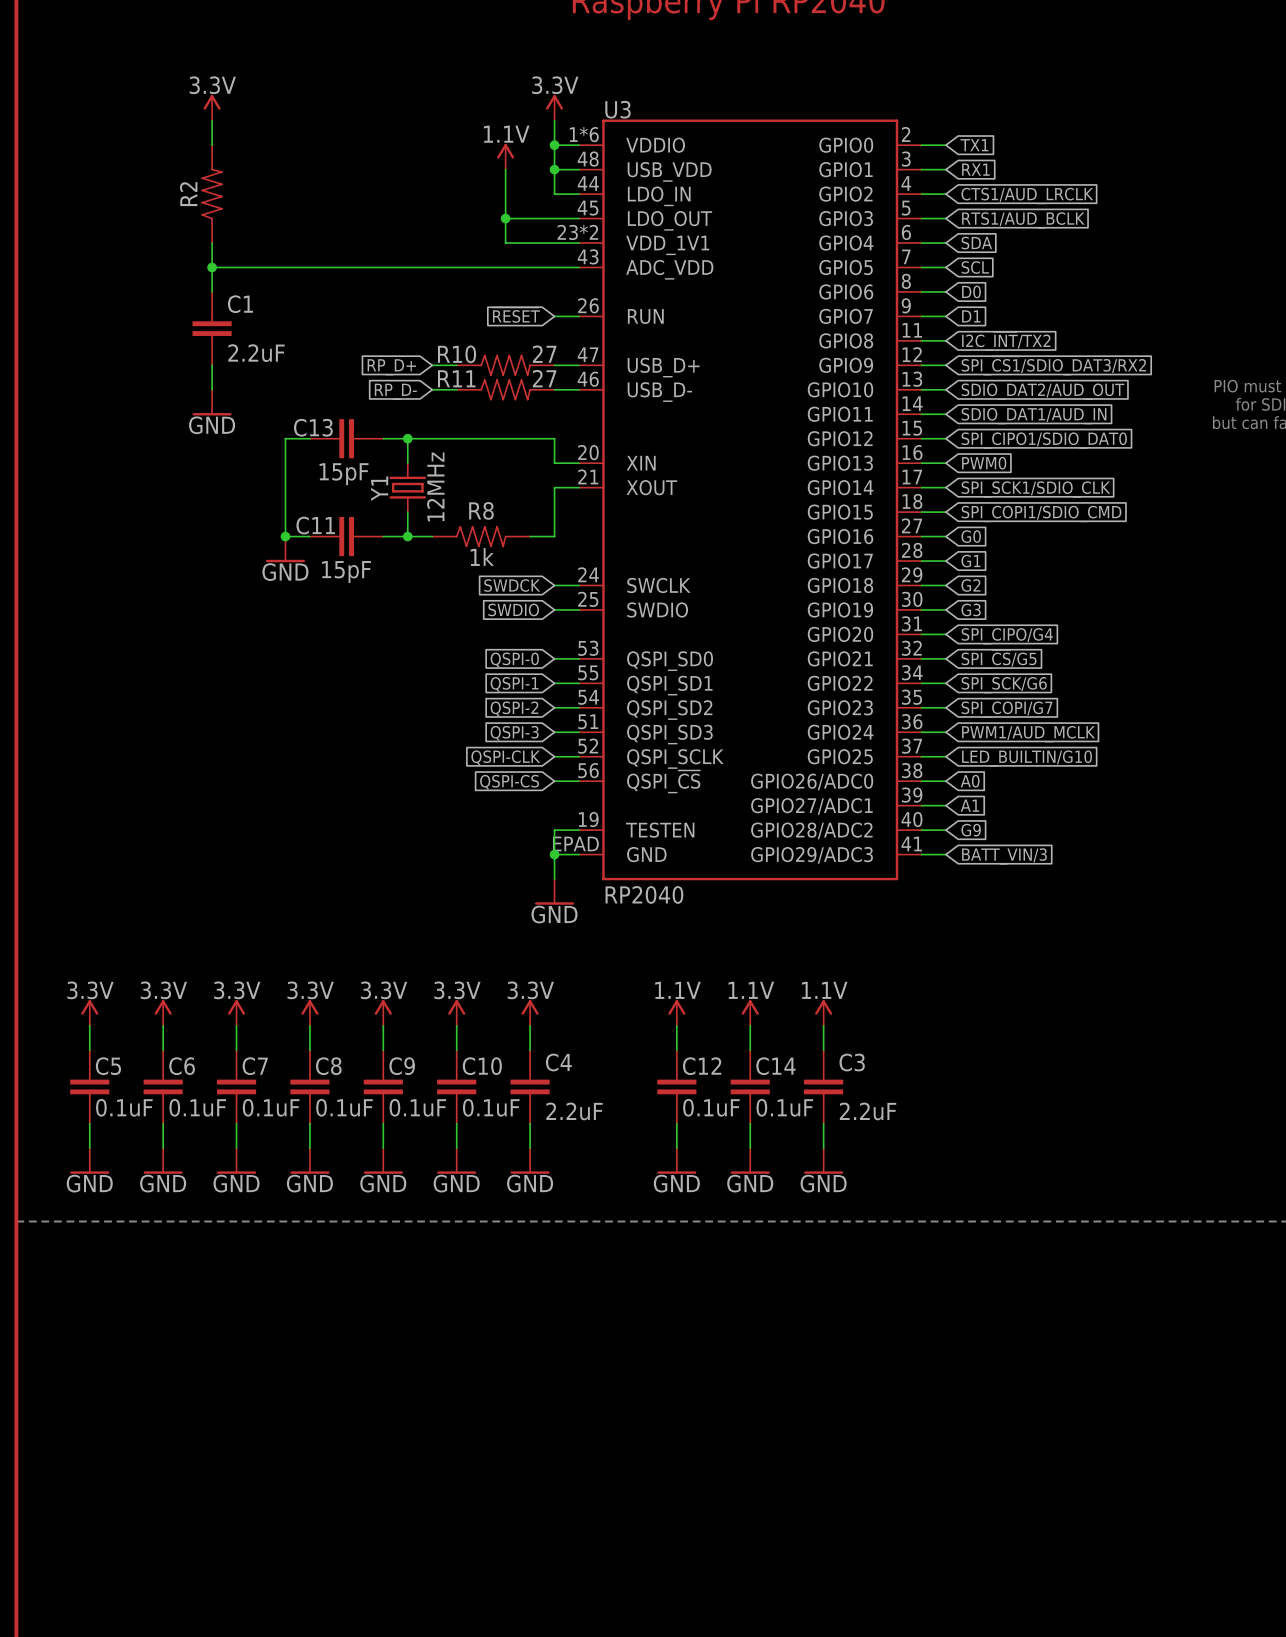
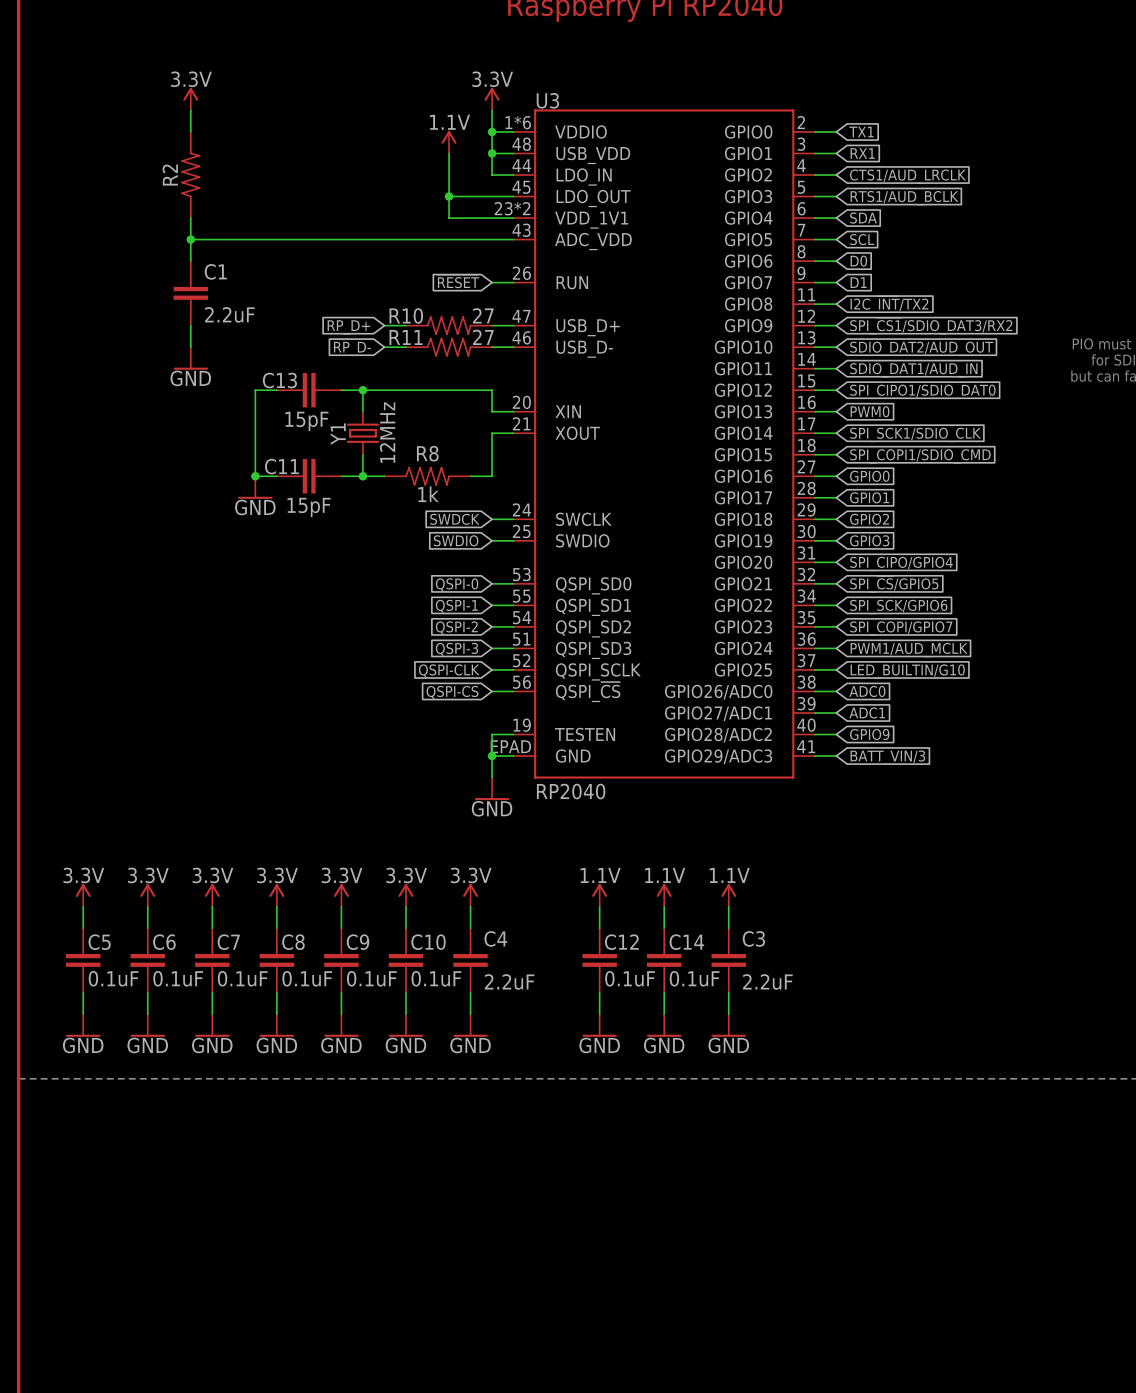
global label: G0 (971, 536) -> GPIO0 (869, 476)
global label: G1 (970, 561) -> GPIO1 (869, 497)
global label: G2 (970, 585) -> GPIO2 (869, 519)
global label: G3 (971, 609) -> GPIO3 (869, 540)
global label: SPI_CIPO/G4 (1007, 636) -> SPI_CIPO/GPIO4 (901, 564)
global label: SPI_~{CS}/G5 (999, 659) -> SPI_~{CS}/GPIO5 (894, 584)
global label: SPI_SCK/G6 (1004, 685) -> SPI_SCK/GPIO6 (898, 607)
global label: SPI_COPI/G7 (1007, 709) -> SPI_COPI/GPIO7 (901, 628)
global label: A0 (970, 781) -> ADC0 (867, 691)
global label: A1 (969, 805) -> ADC1 (867, 712)
global label: G9 (971, 830) -> GPIO9 (869, 734)

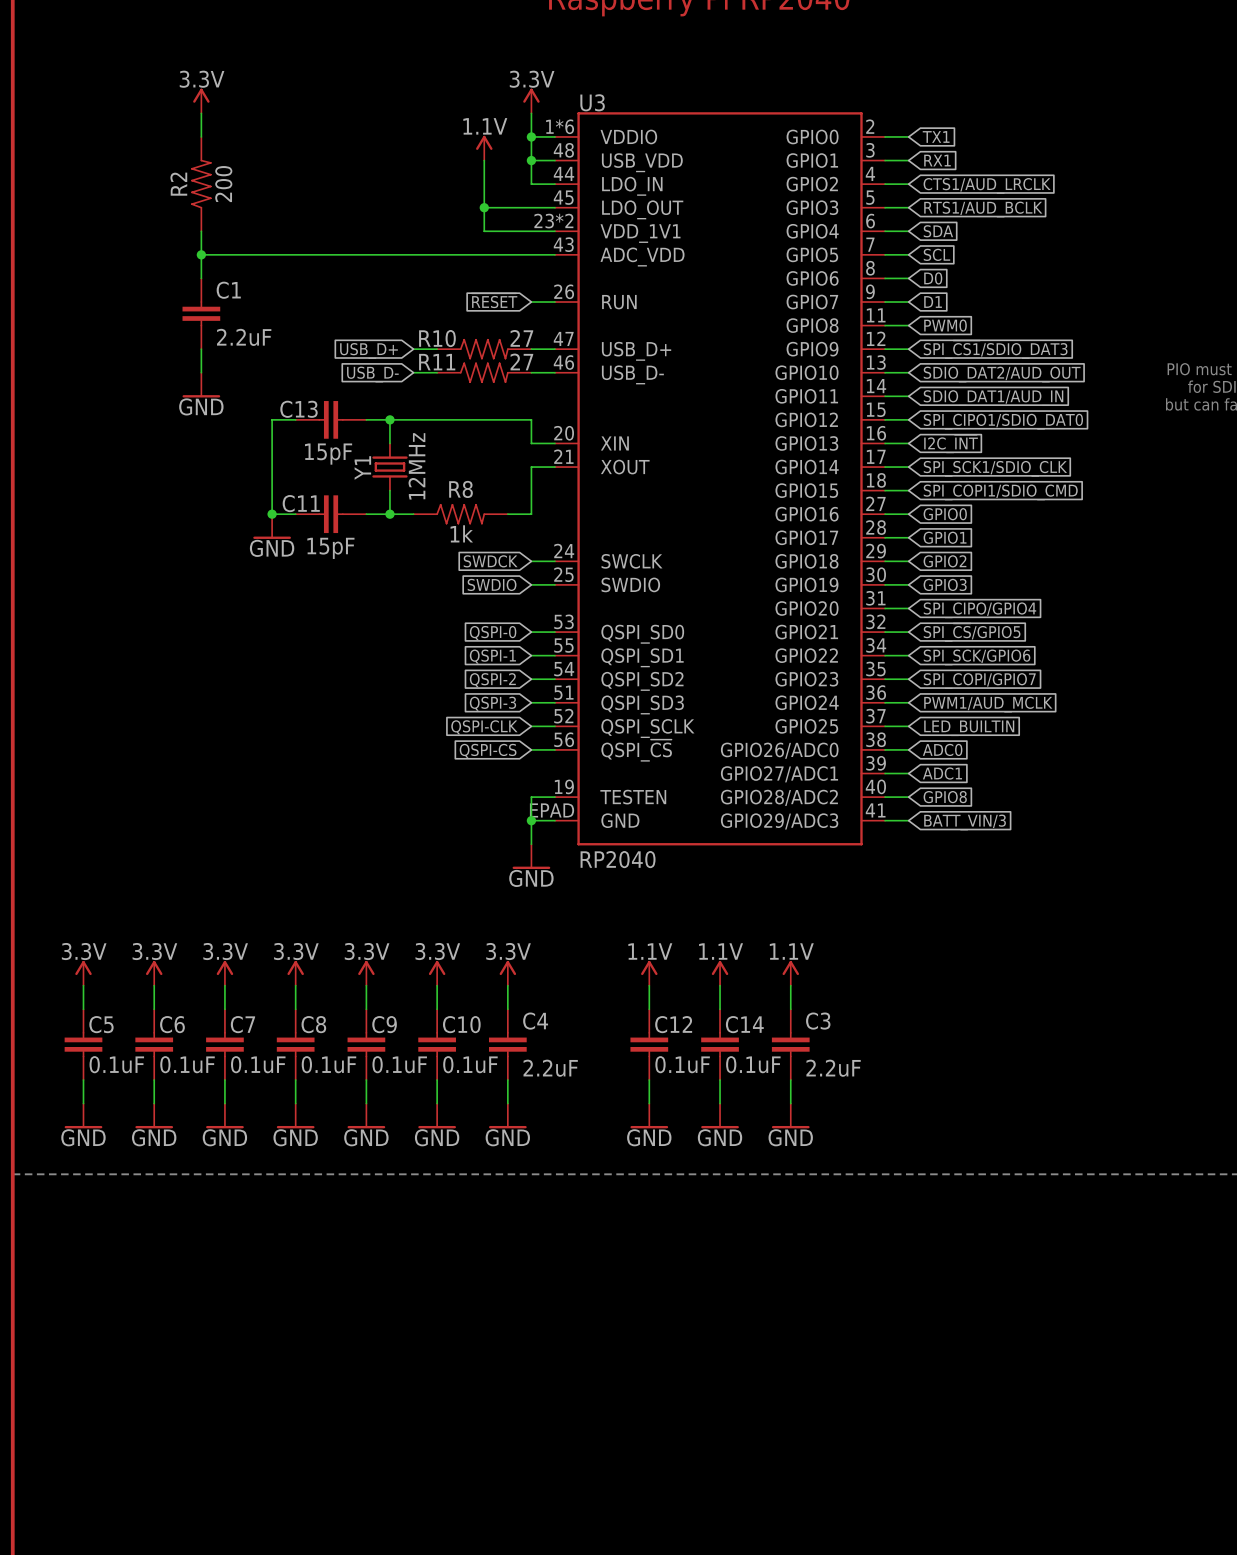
R2 value: none -> 200 (223, 184)
global label: I2C_~{INT}/TX2 (889, 304) -> PWM0 (945, 325)
global label: SPI_~{CS1}/SDIO_DAT3/RX2 (931, 326) -> SPI_~{CS1}/SDIO_DAT3 (995, 349)
global label: RP_D+ (348, 327) -> USB_D+ (368, 350)
global label: RP_D- (352, 348) -> USB_D- (372, 374)
global label: PWM0 (870, 411) -> I2C_~{INT} (951, 444)
global label: LED_BUILTIN/G10 (907, 671) -> LED_BUILTIN (969, 728)
global label: GPIO9 (869, 734) -> GPIO8 (945, 797)

